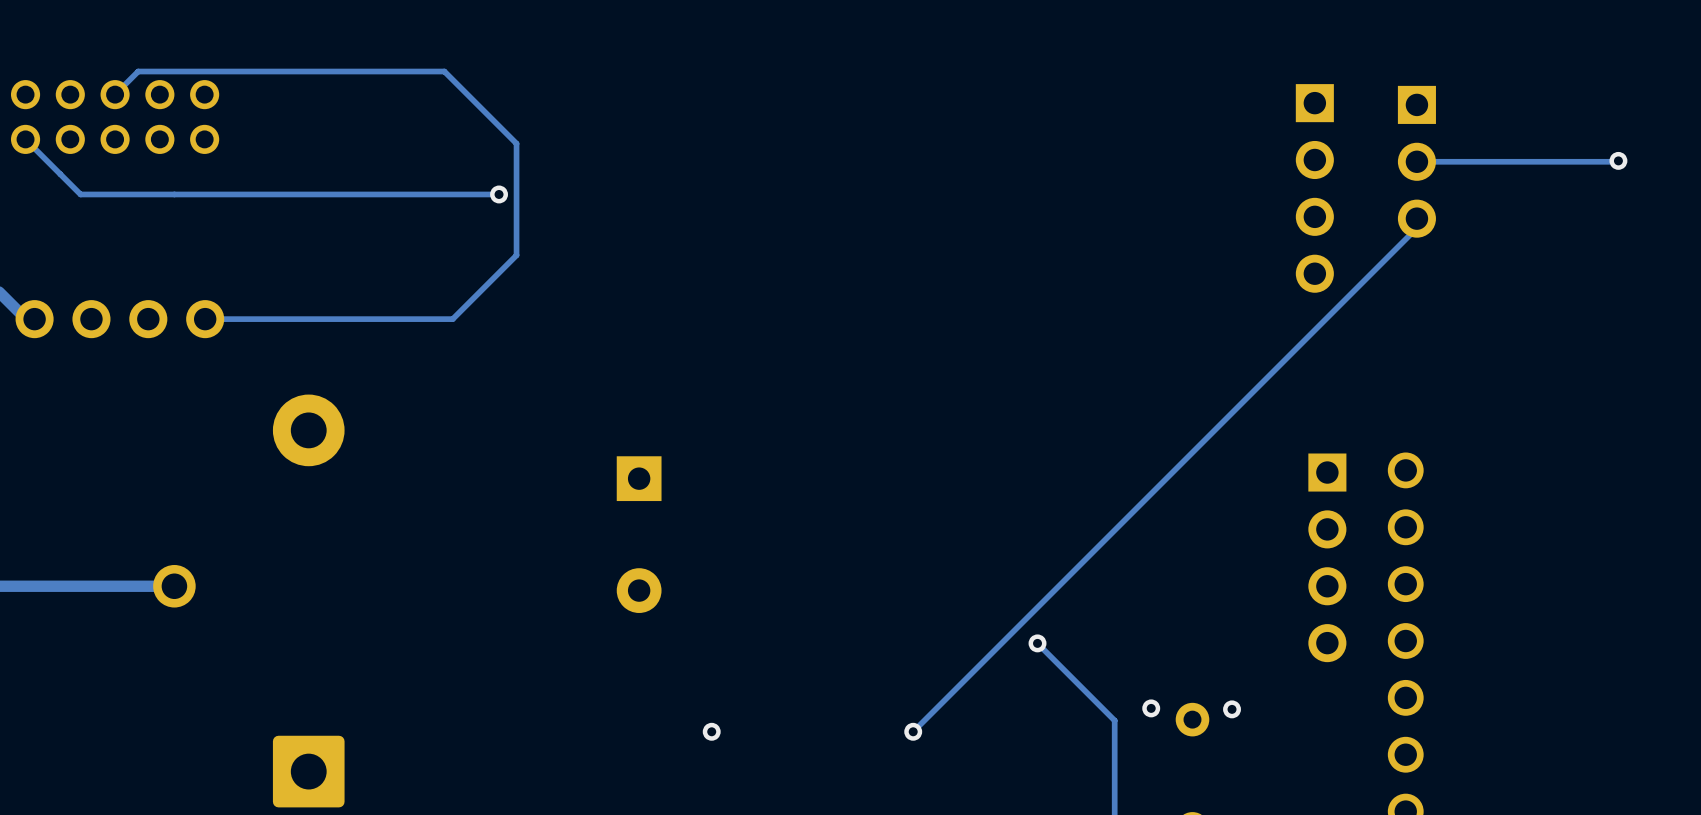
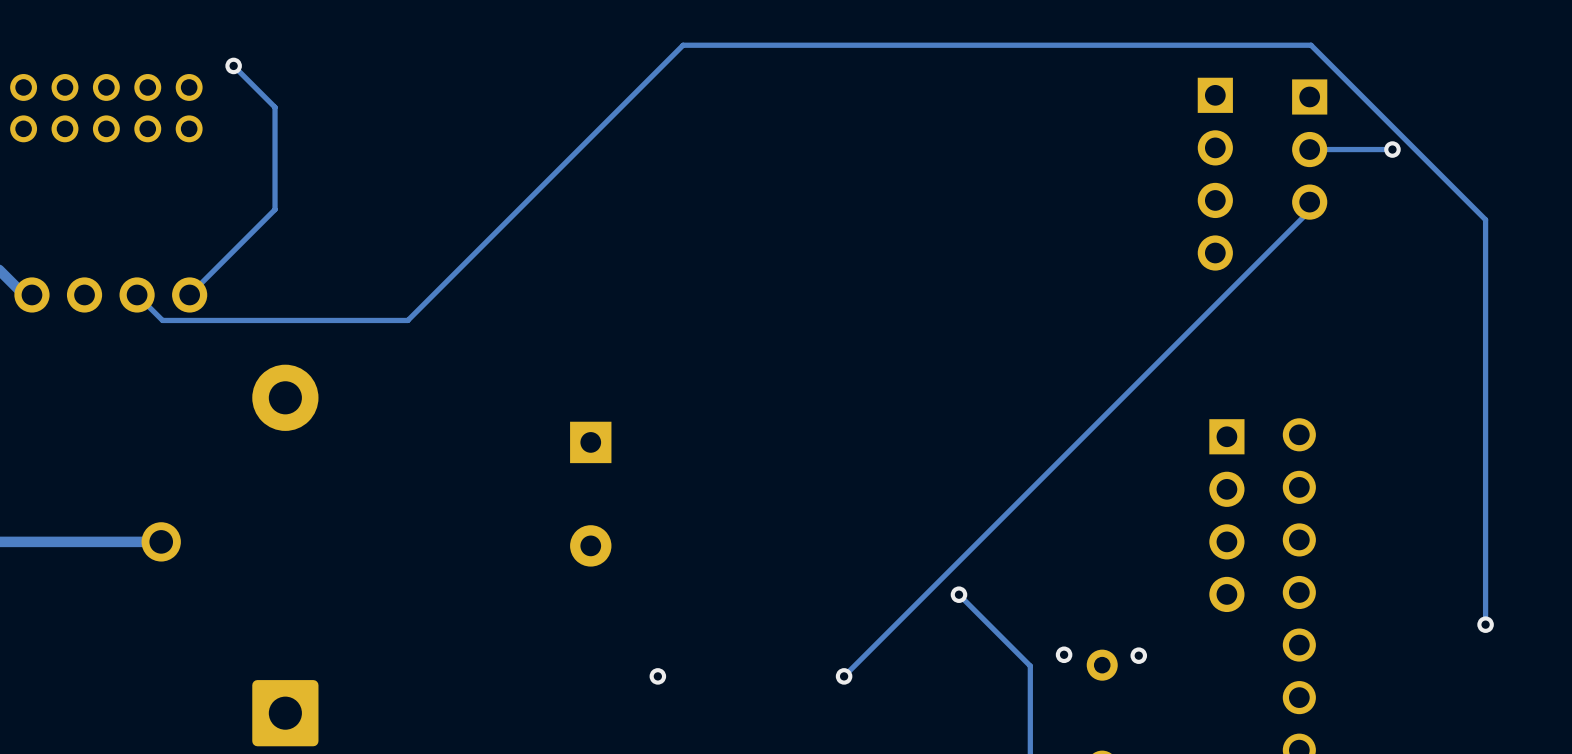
via: none -> (233, 65)
track: (115, 94) (138, 71) (444, 71) (516, 143) (516, 255) (452, 319) (205, 319) -> (233, 65) (275, 107) (275, 209) (189, 294)
track: (25, 139) (80, 194) (499, 194) -> none
track: (1618, 160) (1506, 161) -> none
via position: (1618, 160) -> (1392, 149)
via: (499, 194) -> none
track: none -> (137, 294) (162, 320) (407, 320) (683, 45) (1311, 45) (1485, 219) (1485, 624)
via: none -> (1485, 624)

